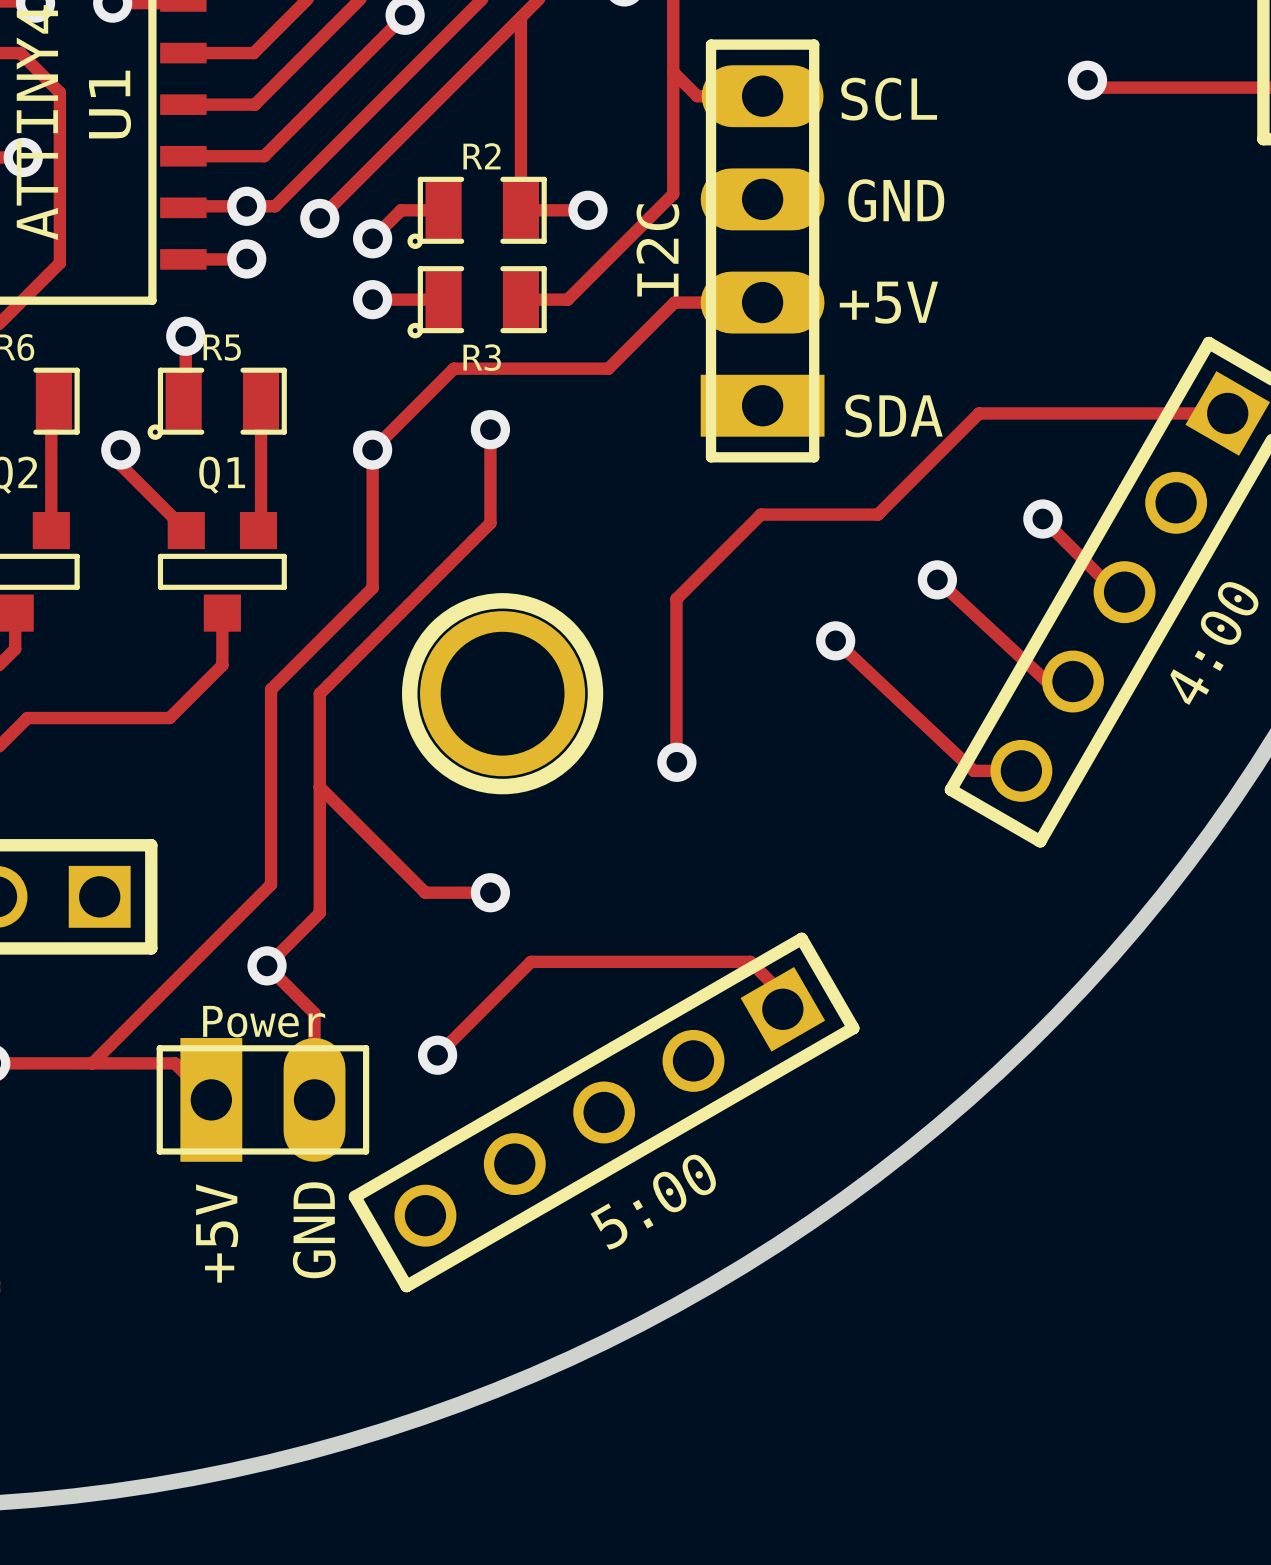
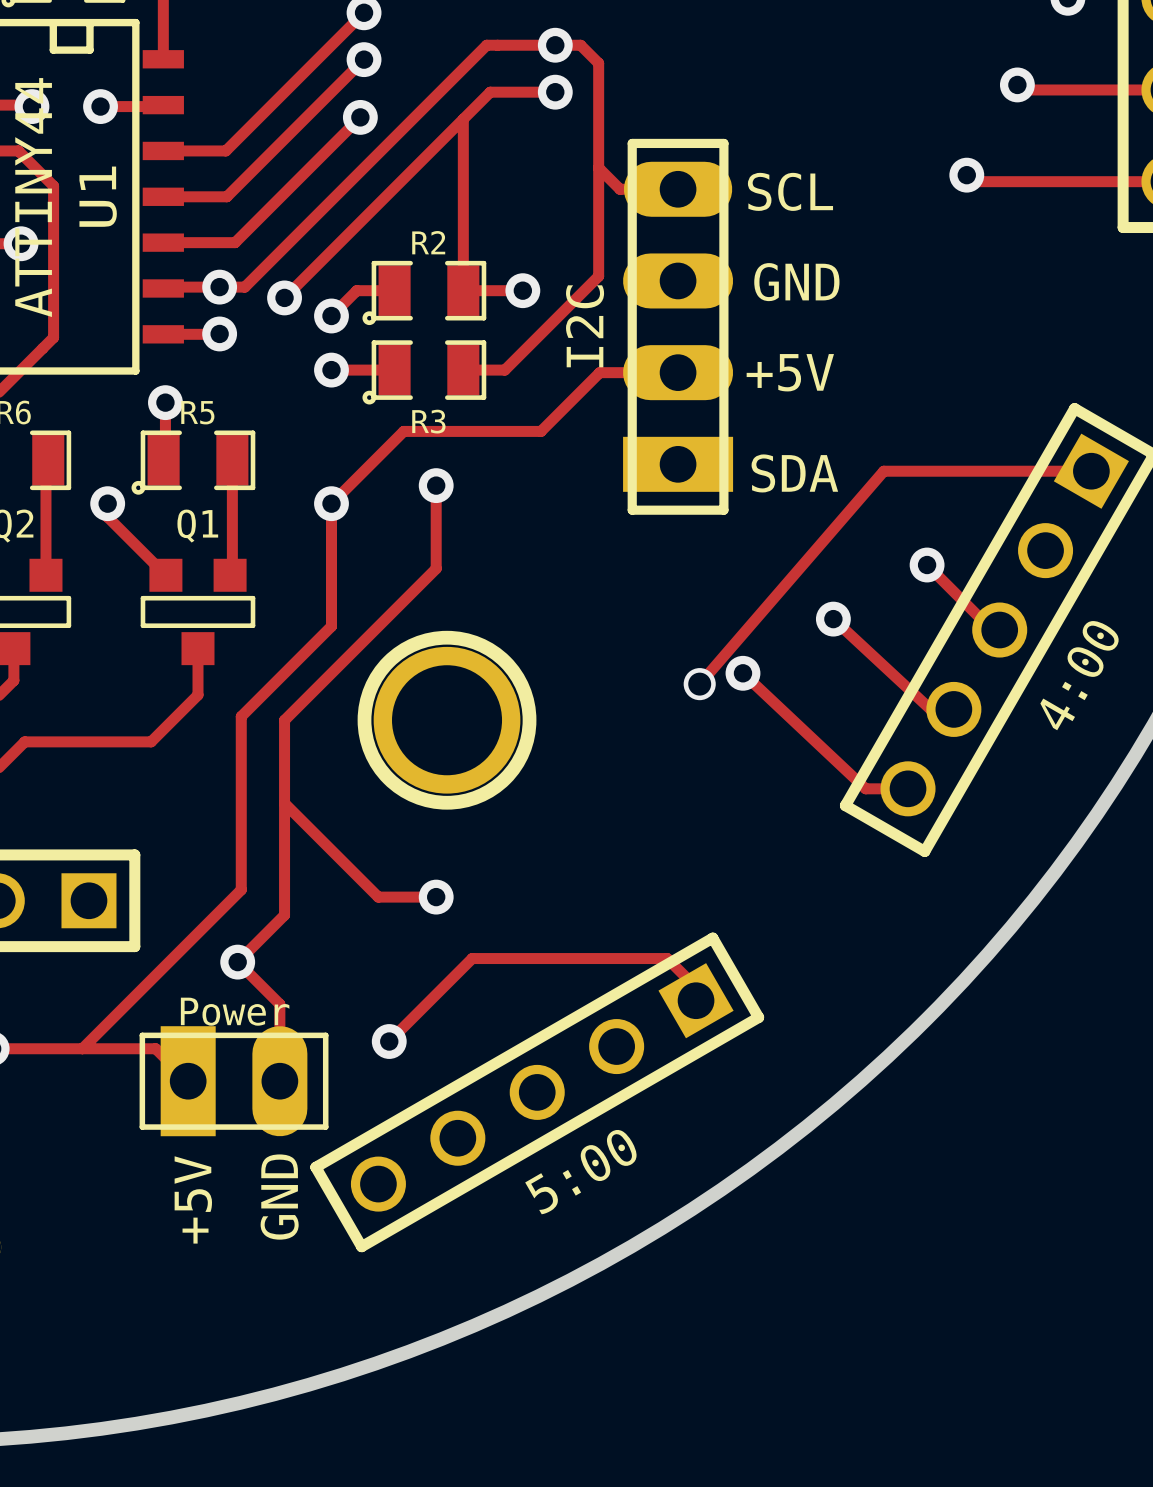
track: (994, 413) (979, 413) (877, 514) (760, 514) (676, 599) (676, 761) -> (883, 471) (699, 684)
via: none -> (699, 684)
via: (676, 762) -> none

